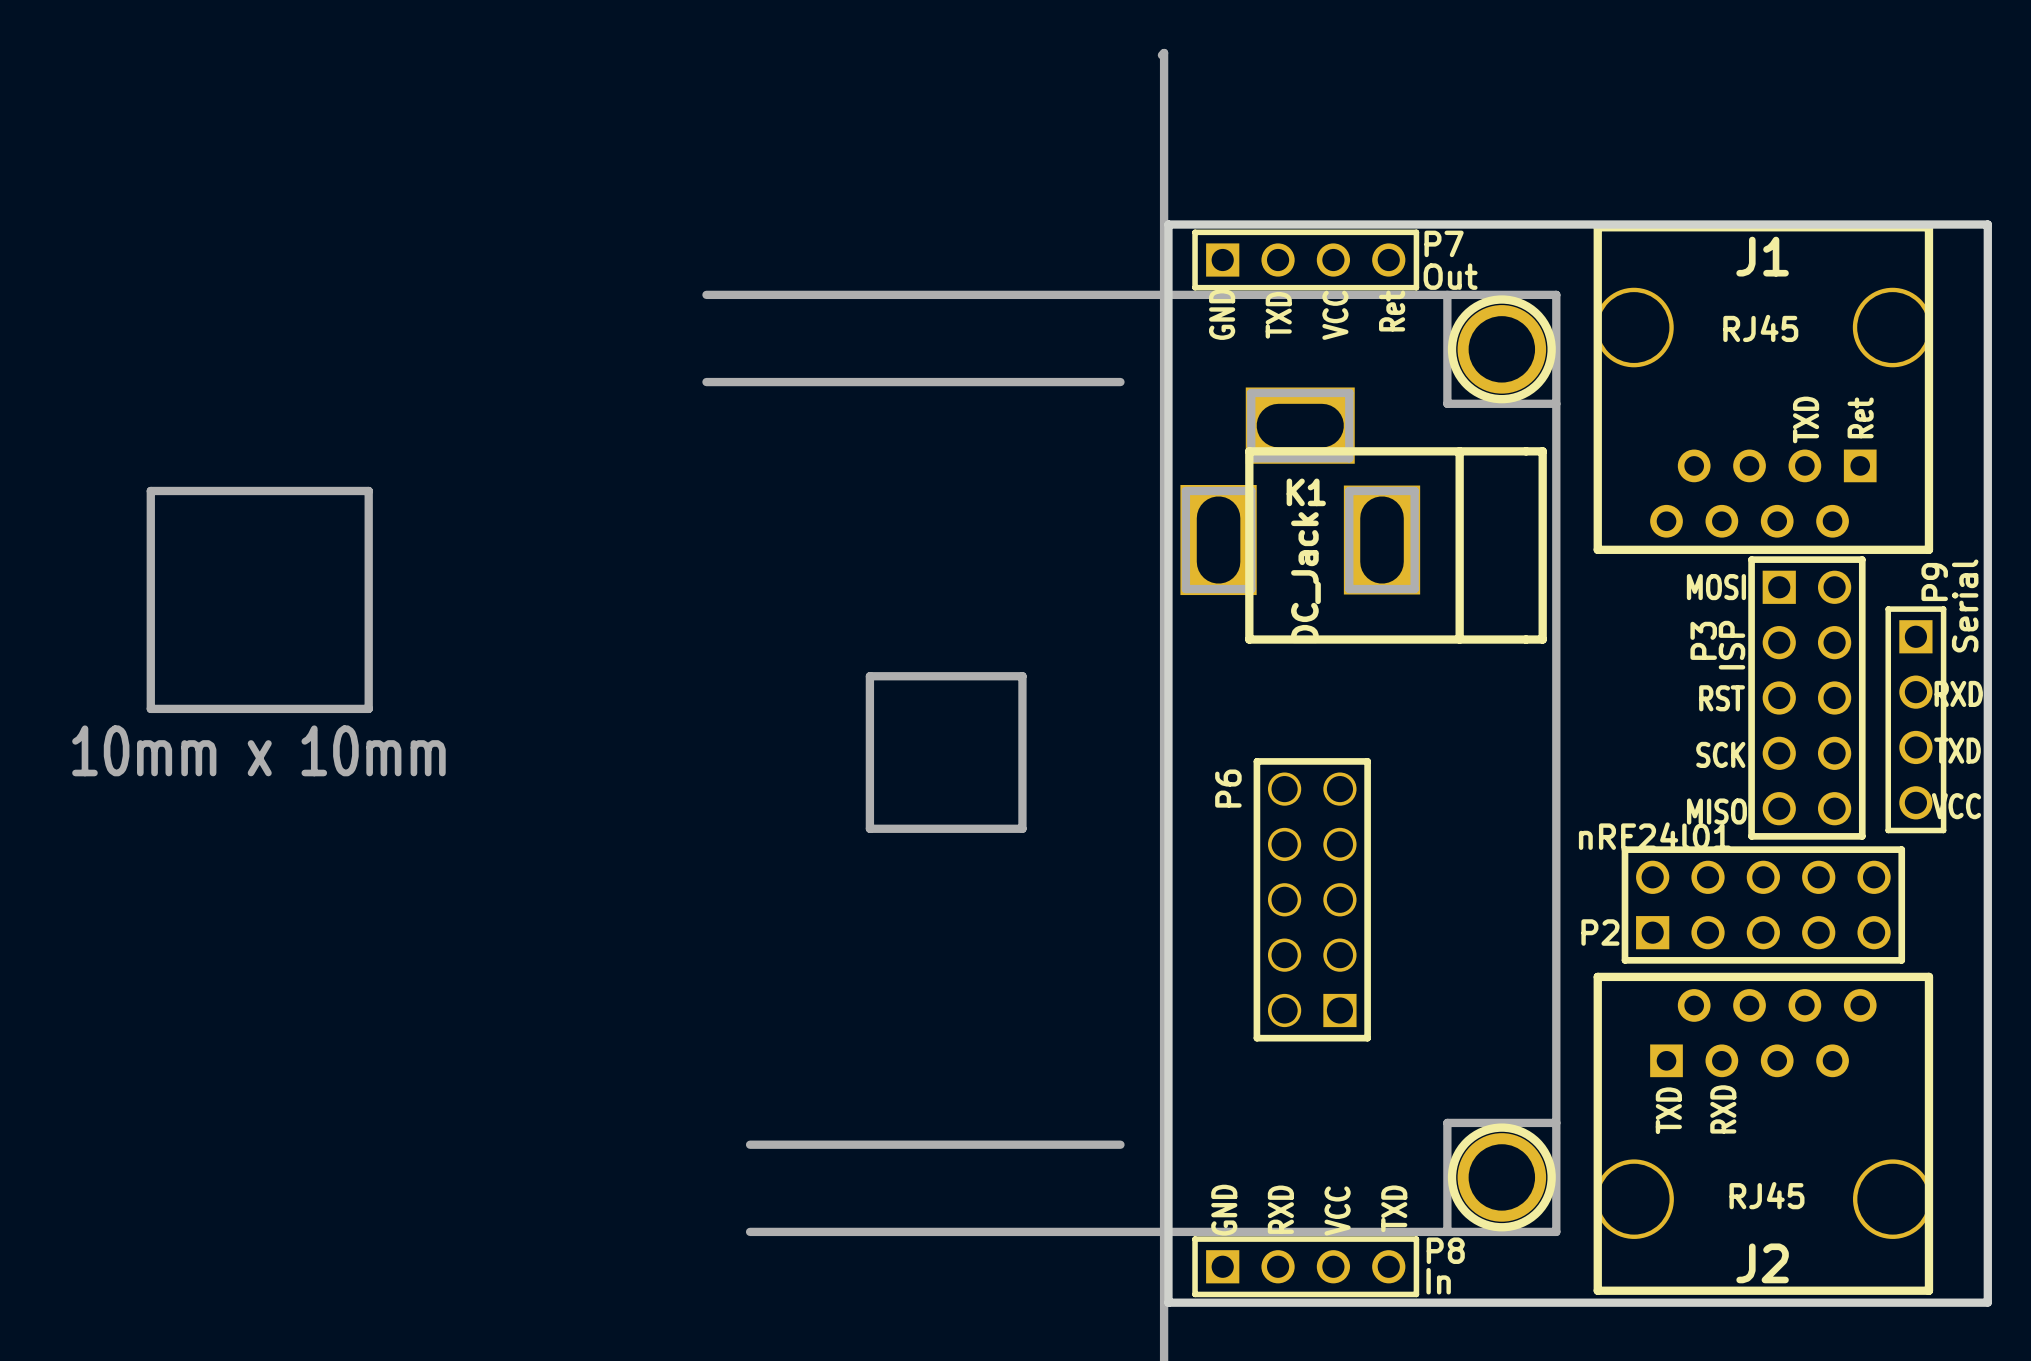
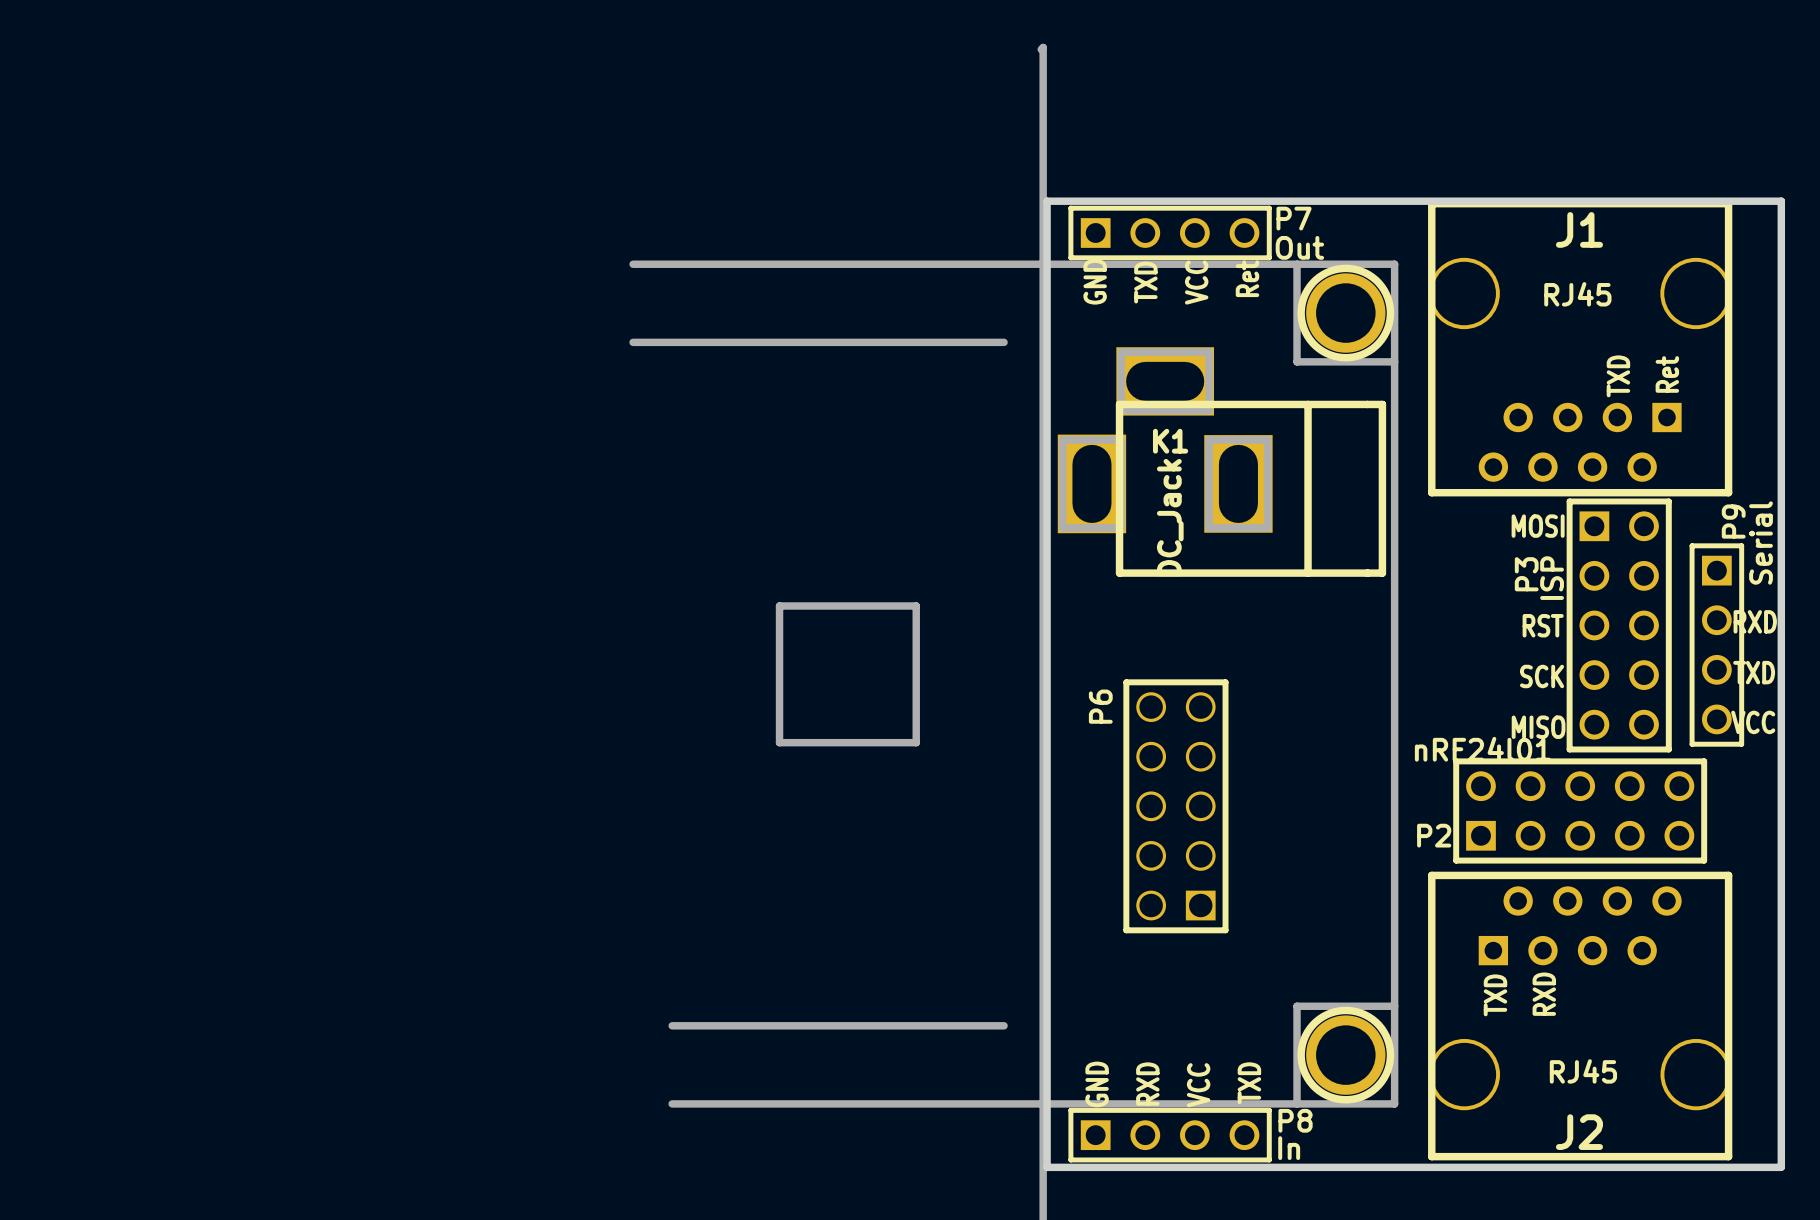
line: (150, 490) (368, 490) (368, 708) (150, 708) (150, 490) -> none
text: 10mm x 10mm (258, 750) -> none

